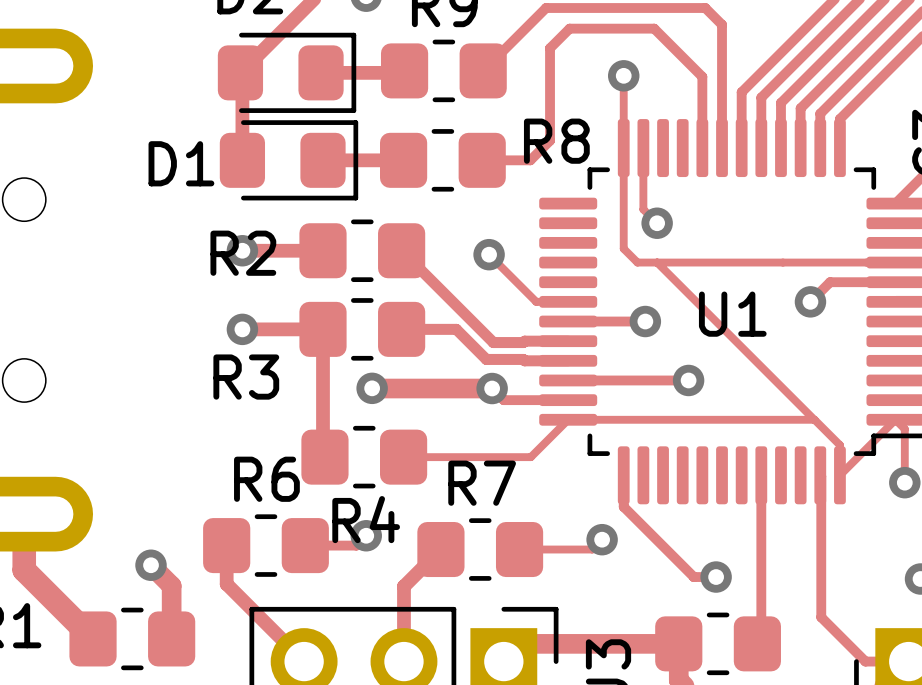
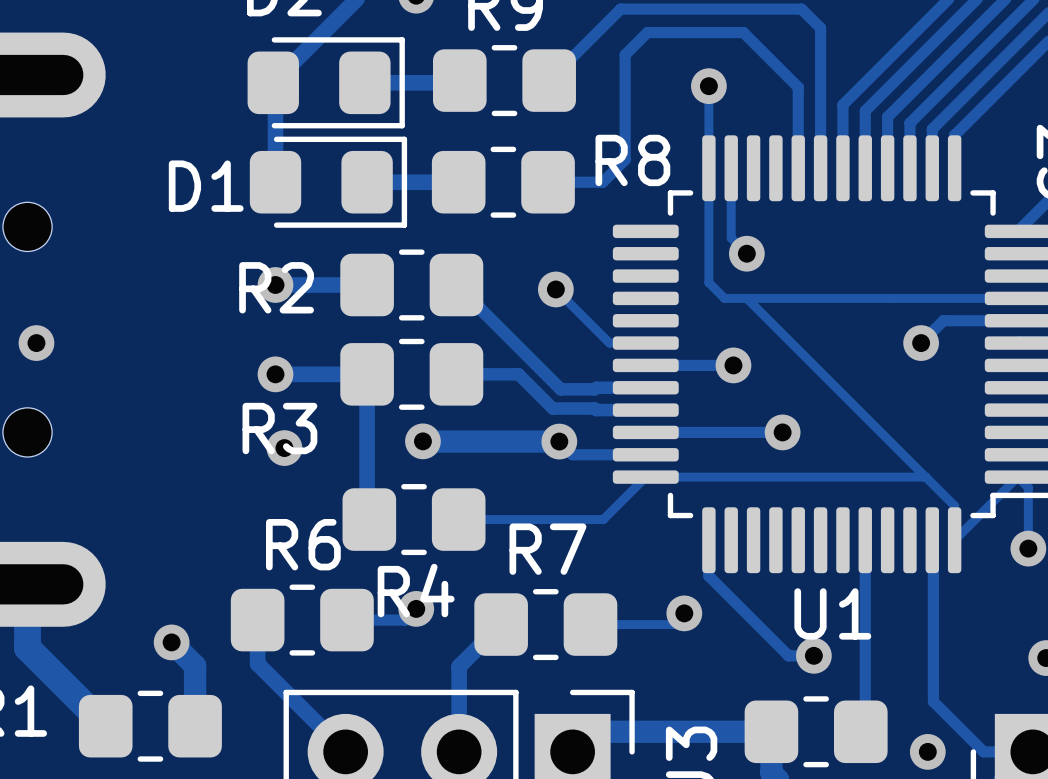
via: none -> (36, 343)
U1 name position: U1 (732, 314) -> U1 (832, 613)
via: none -> (284, 448)
via: none -> (927, 751)

